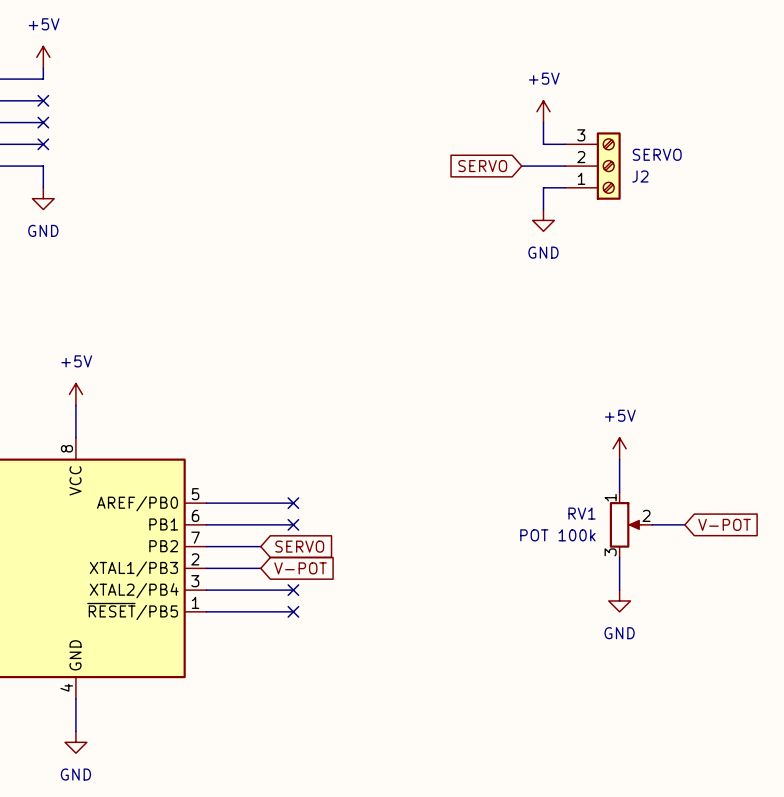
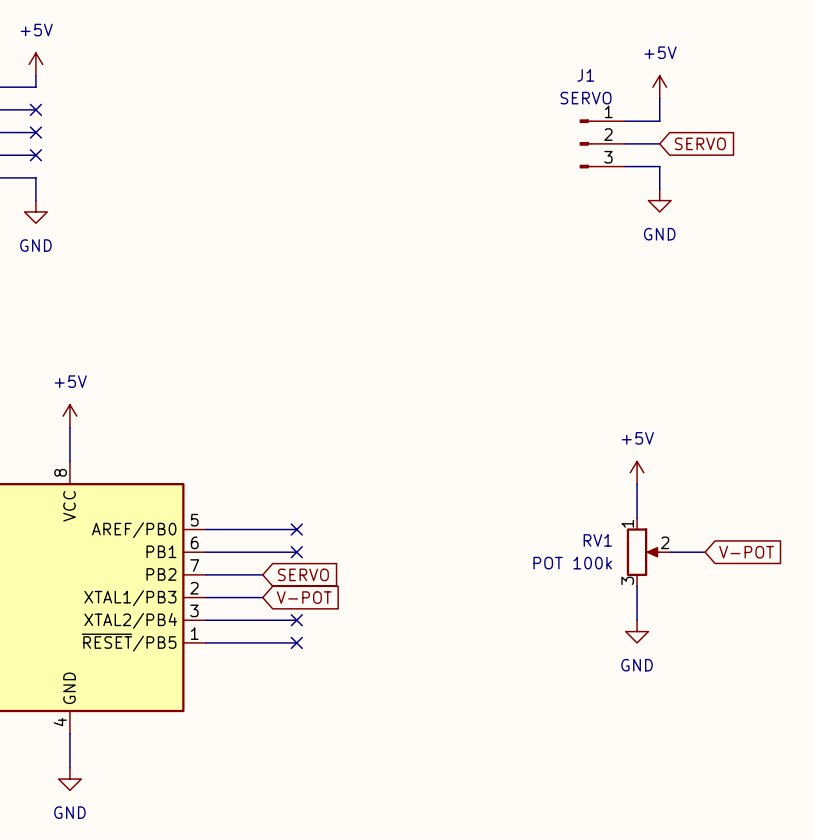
wire: none -> (659, 98) (659, 121) (625, 121)
power symbol position: +5V (543, 111) -> +5V (659, 87)
wire: (543, 122) (543, 144) (565, 144) -> none
J1: none -> SERVO (602, 143)
wire: none -> (625, 143) (659, 143)
wire: none -> (625, 166) (659, 166) (659, 189)
global label rotation: 0° (482, 166) -> 180° (700, 143)
global label position: SERVO (482, 166) -> SERVO (700, 143)
wire: (521, 166) (565, 166) -> none
J2: SERVO (592, 166) -> none
wire: (565, 187) (543, 187) (543, 209) -> none
power symbol position: GND (543, 220) -> GND (659, 200)

